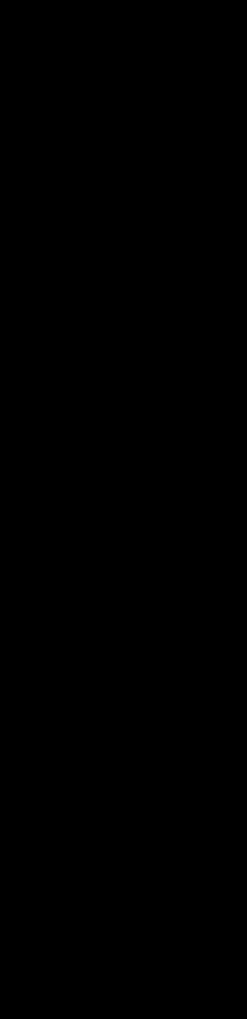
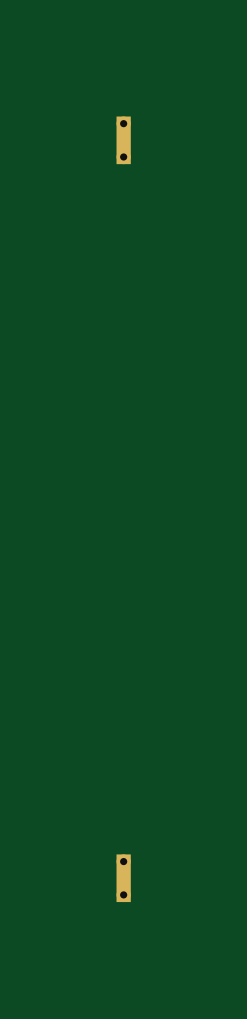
part: none -> (123, 140)
part: none -> (123, 878)

